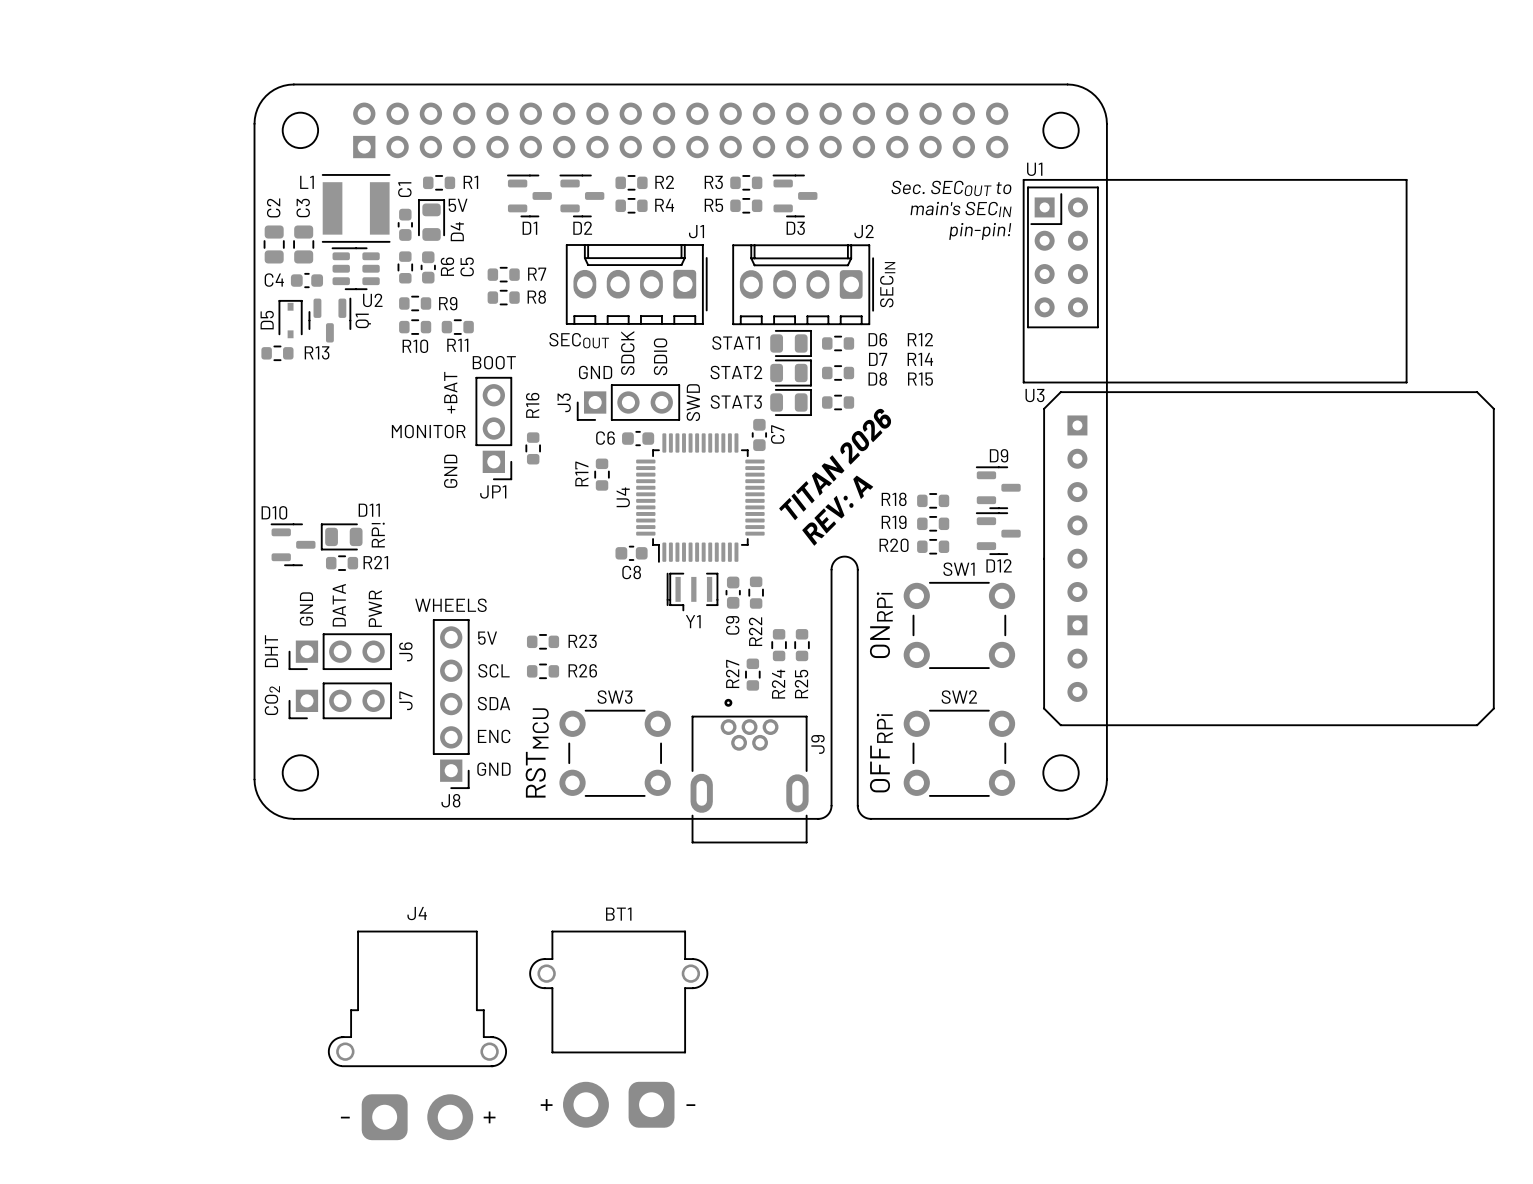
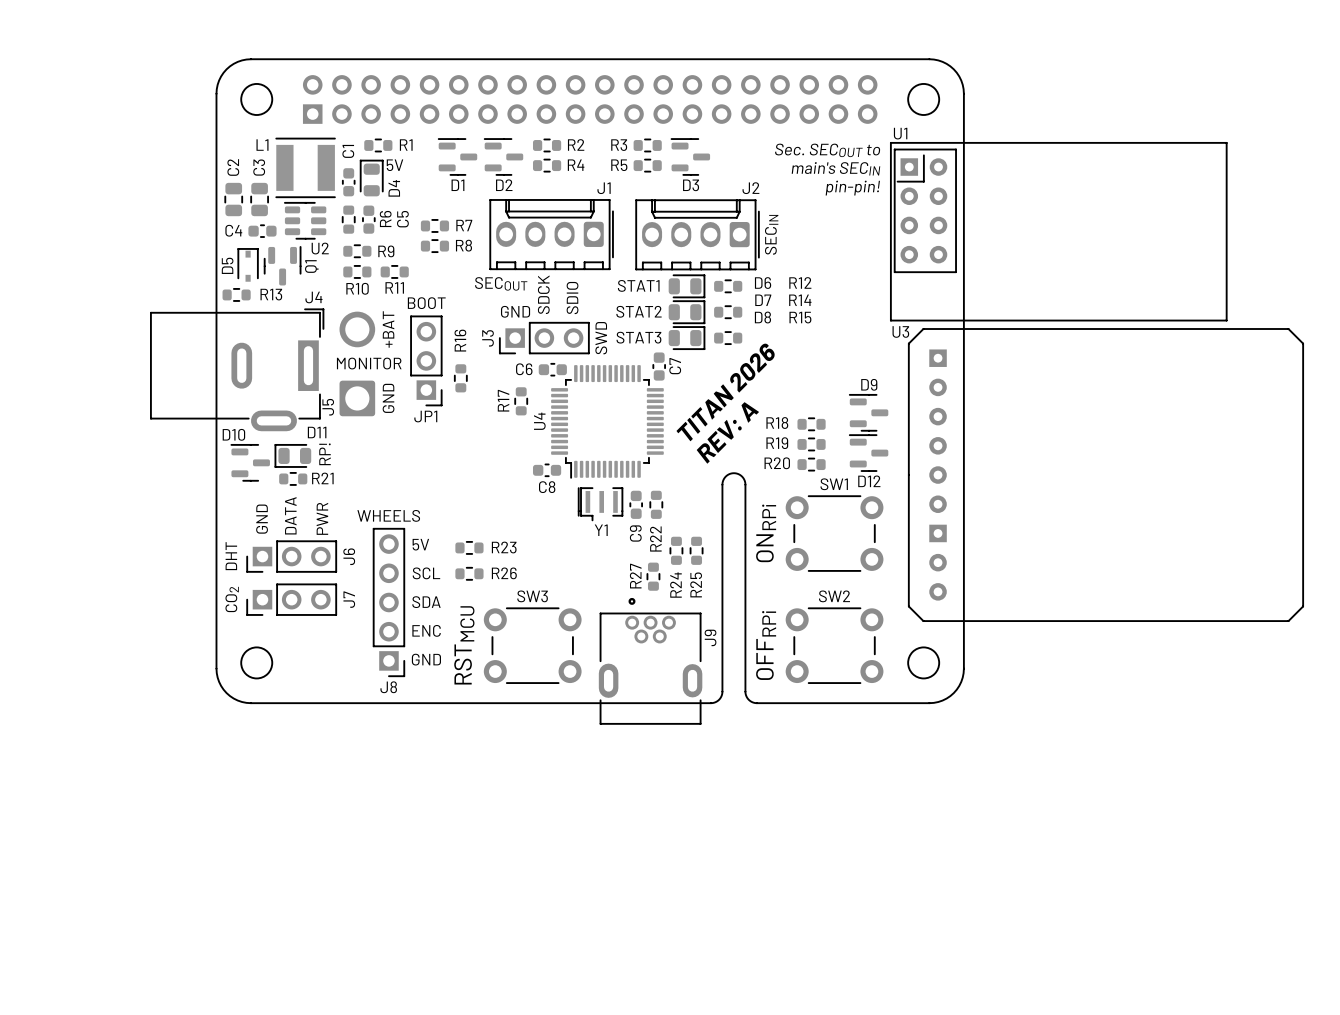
J5: none -> (357, 363)
J4 name position: J4 (417, 913) -> J4 (313, 297)
J4 footprint: [328, 930, 507, 1141] -> [150, 308, 325, 432]
BT1: (618, 1029) -> none

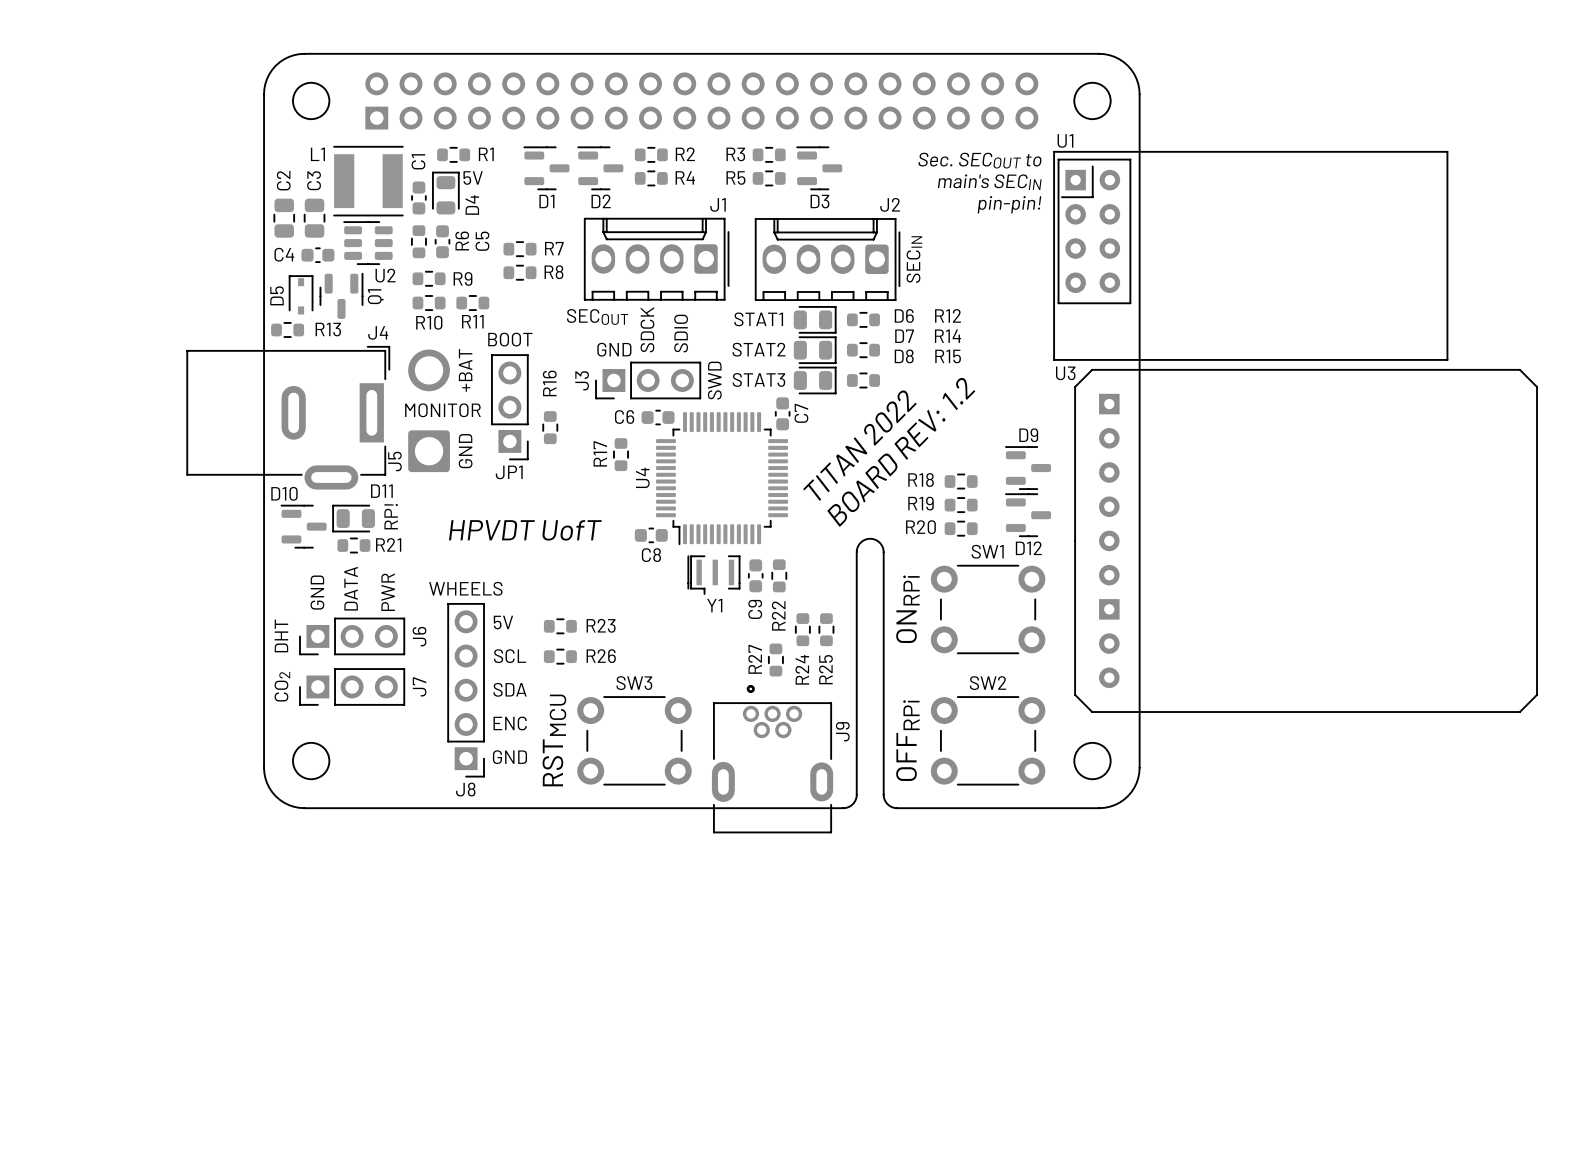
text: TITAN 2026 (725, 392) -> TITAN 2022 (859, 445)
text: REV: A (727, 432) -> BOARD REV: 1.2 (901, 452)
text: none -> HPVDT UofT (525, 530)

